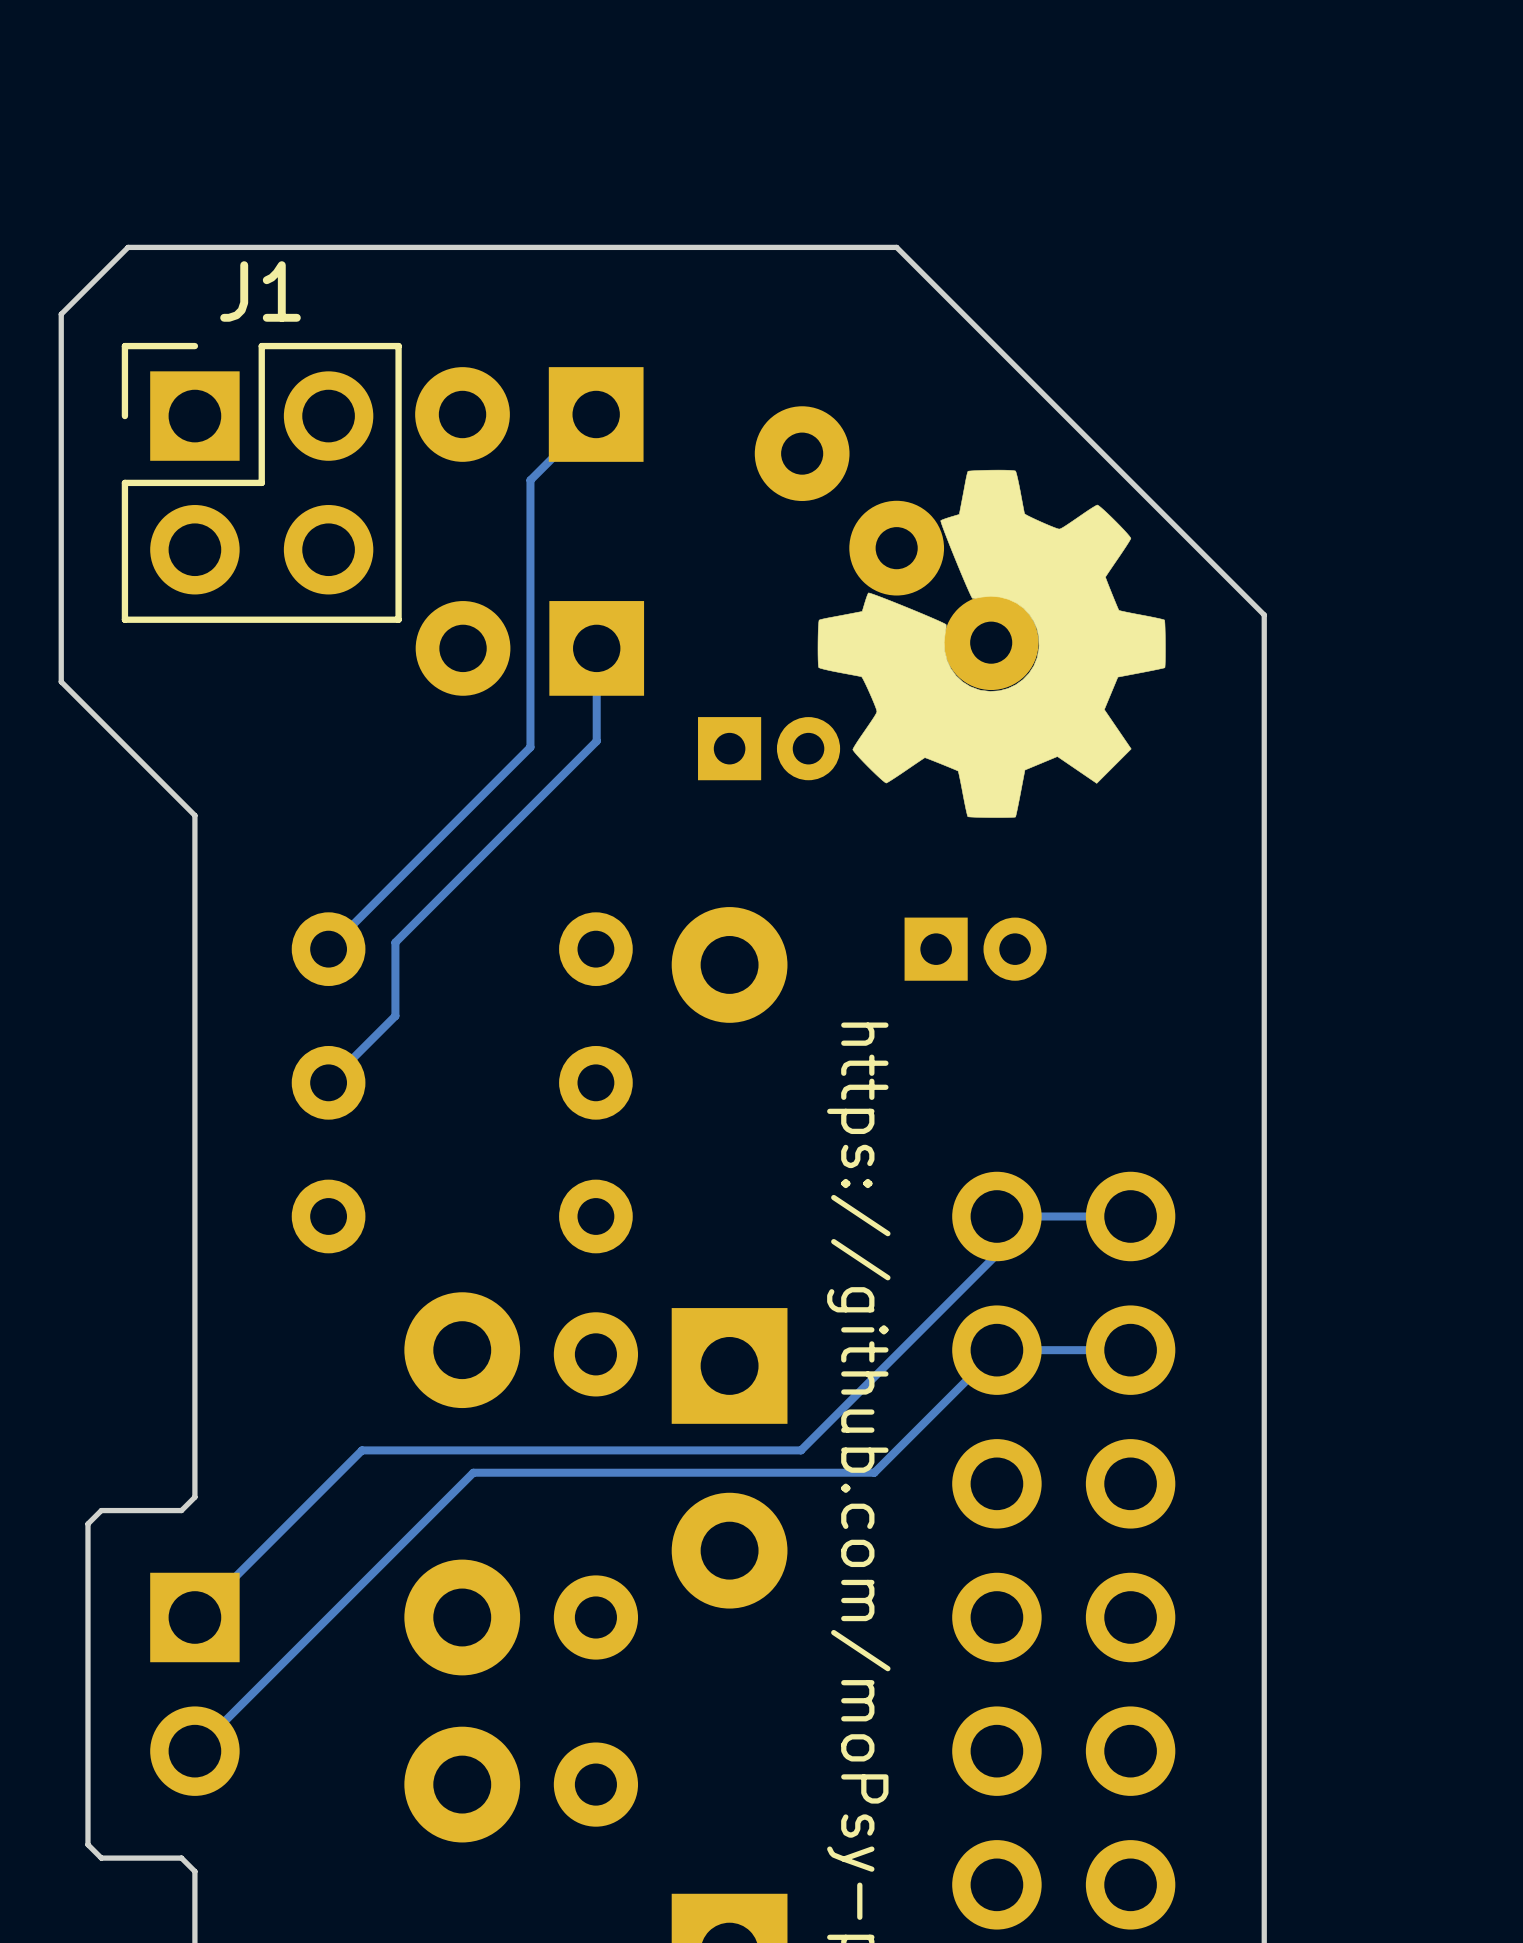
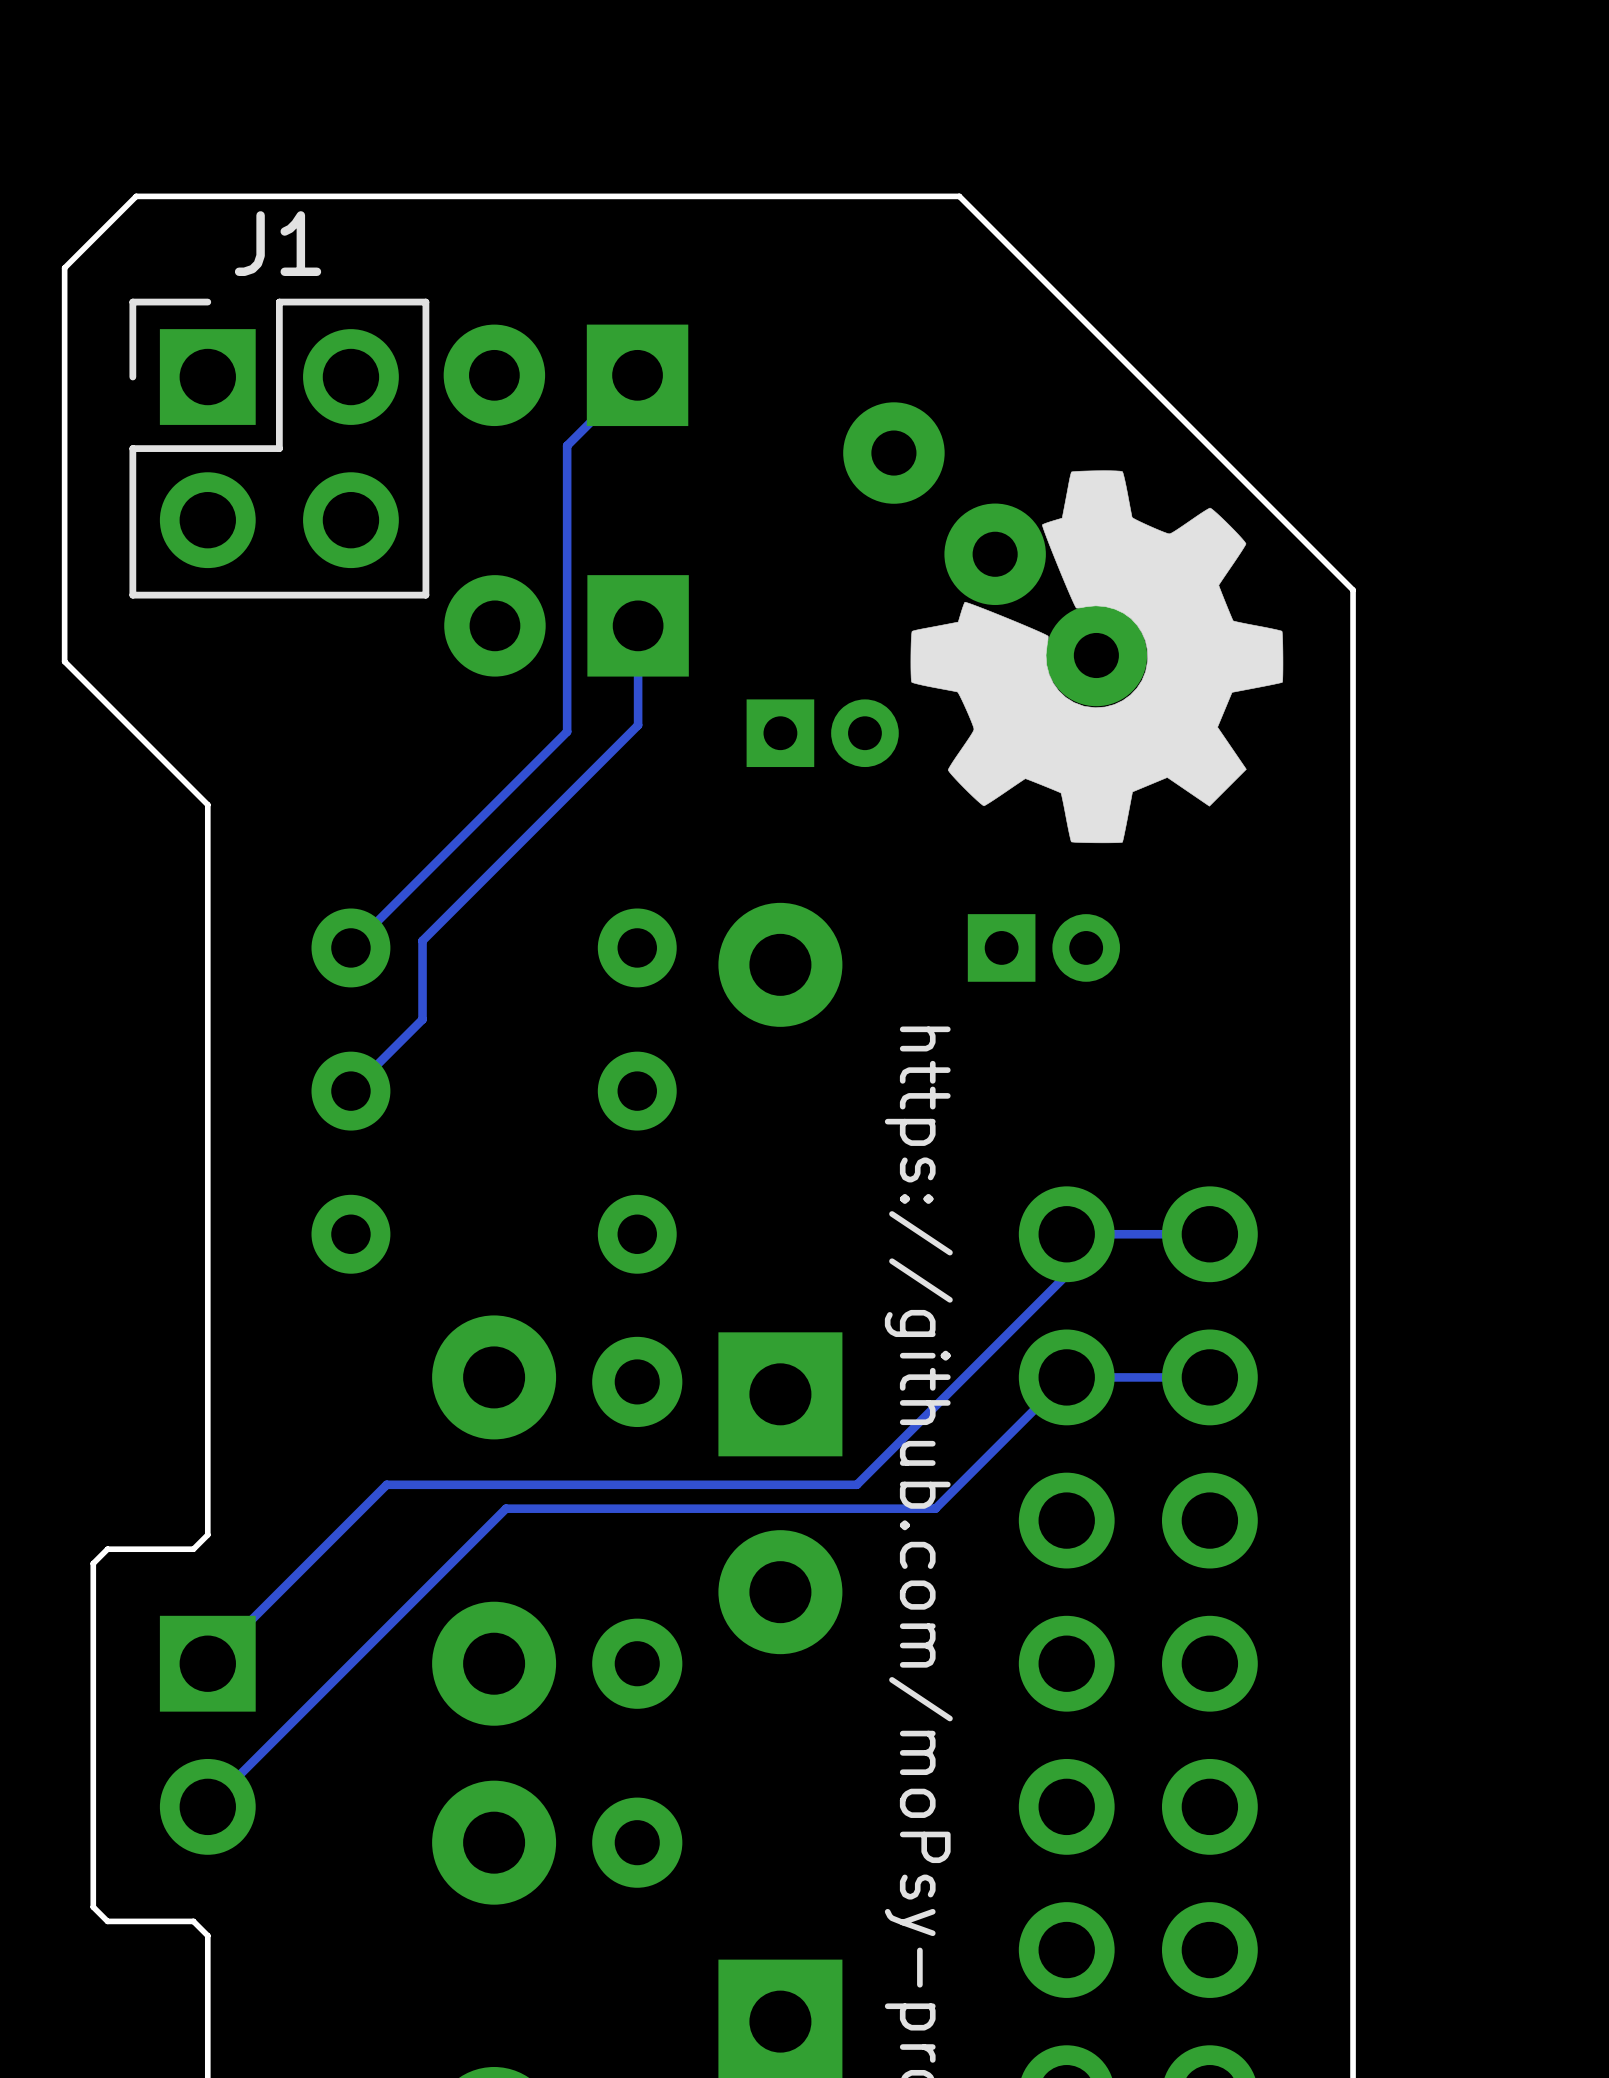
part position: (896, 548) -> (995, 554)
drawing position: (991, 643) -> (1096, 656)

